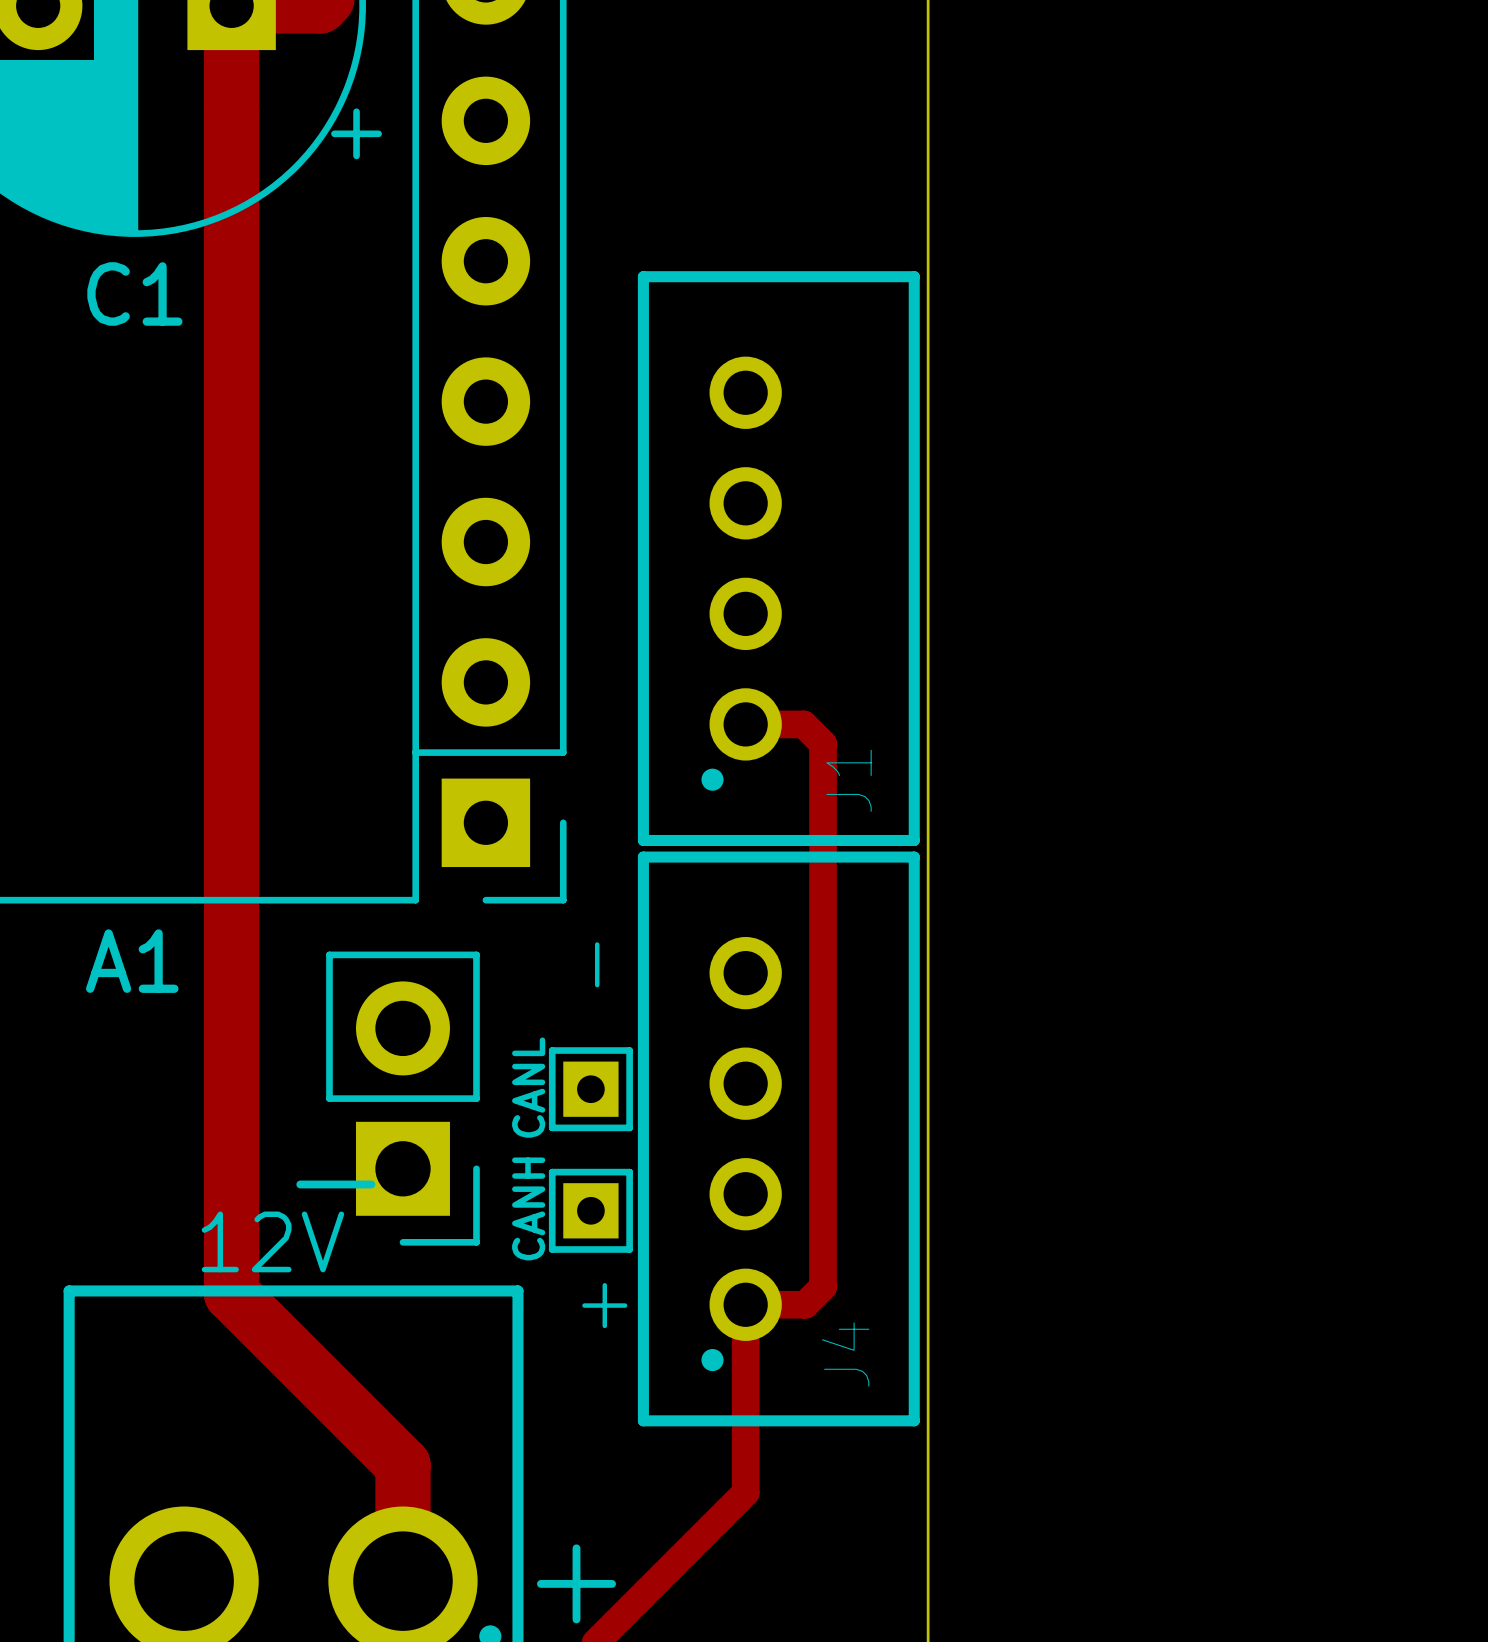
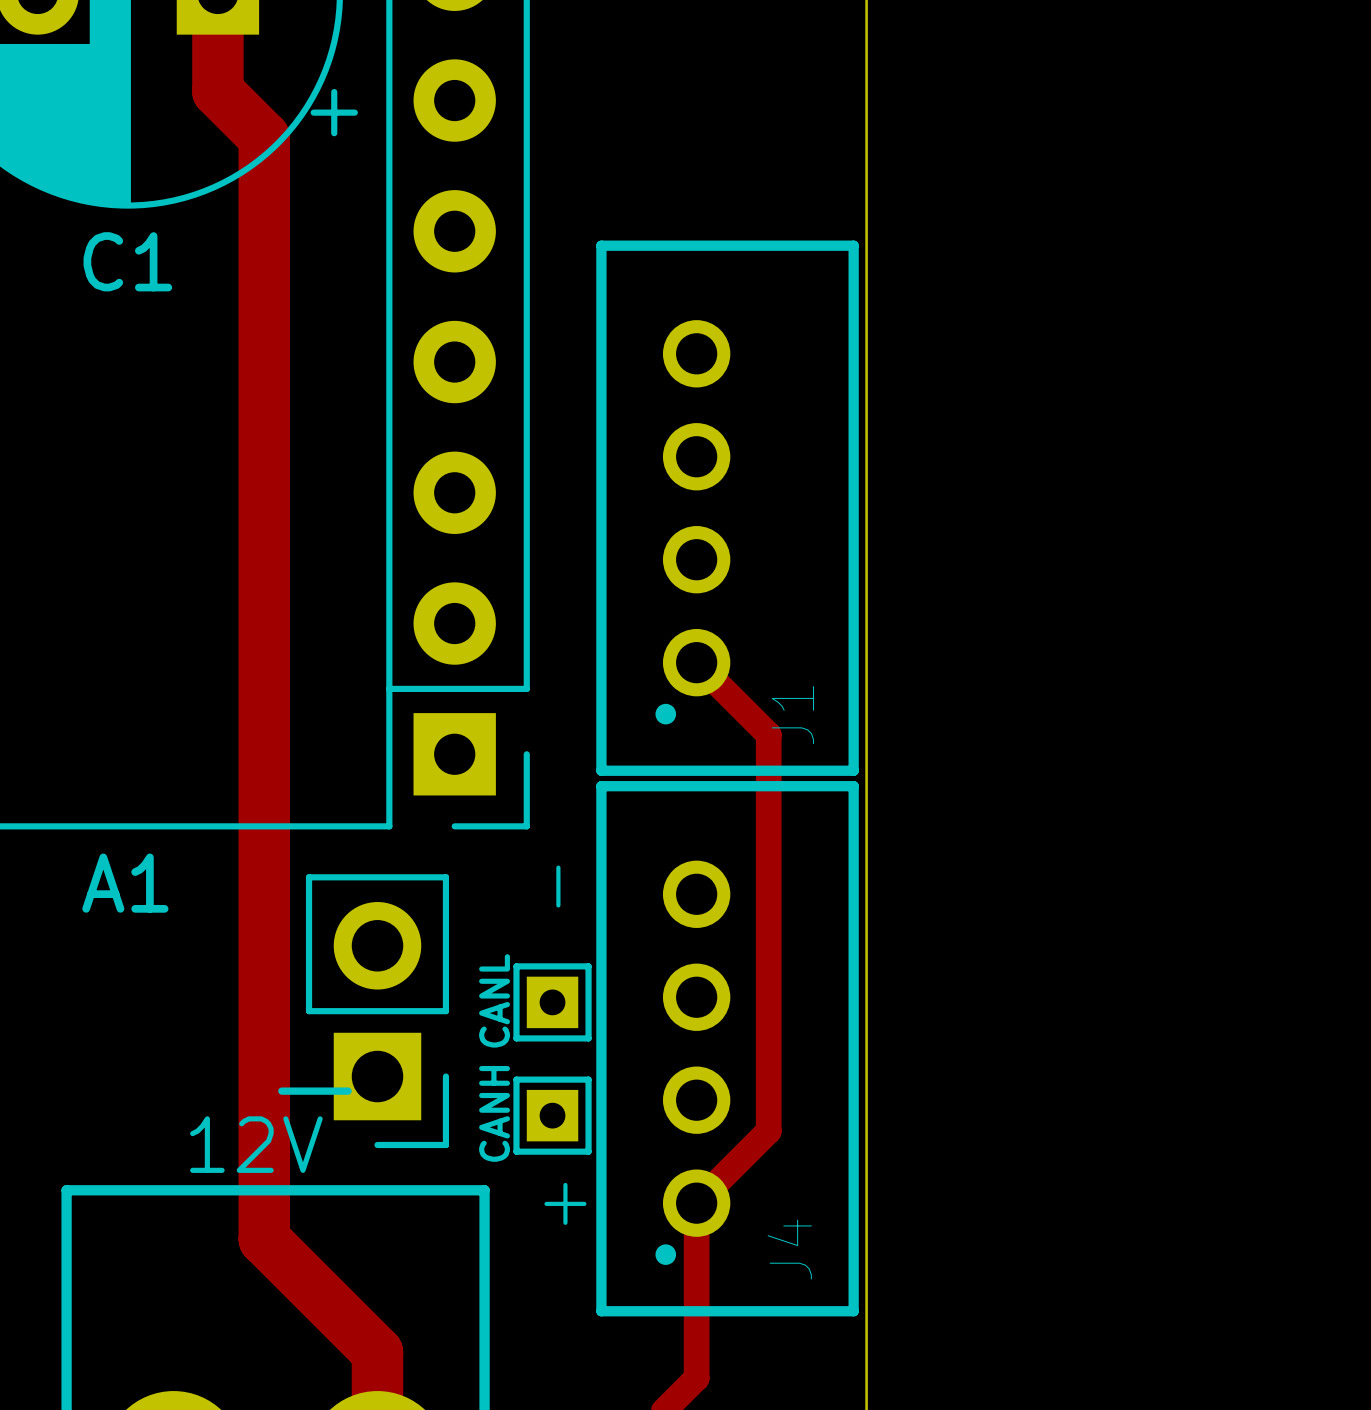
track: (231, 110) (231, 1293) (281, 1343) -> (217, 91) (264, 137) (264, 1239)
track: (745, 724) (803, 724) (823, 743) (823, 801) -> (696, 662) (768, 734)
track: (823, 1227) (823, 1286) (805, 1304) (745, 1304) -> (768, 1131) (696, 1203)

